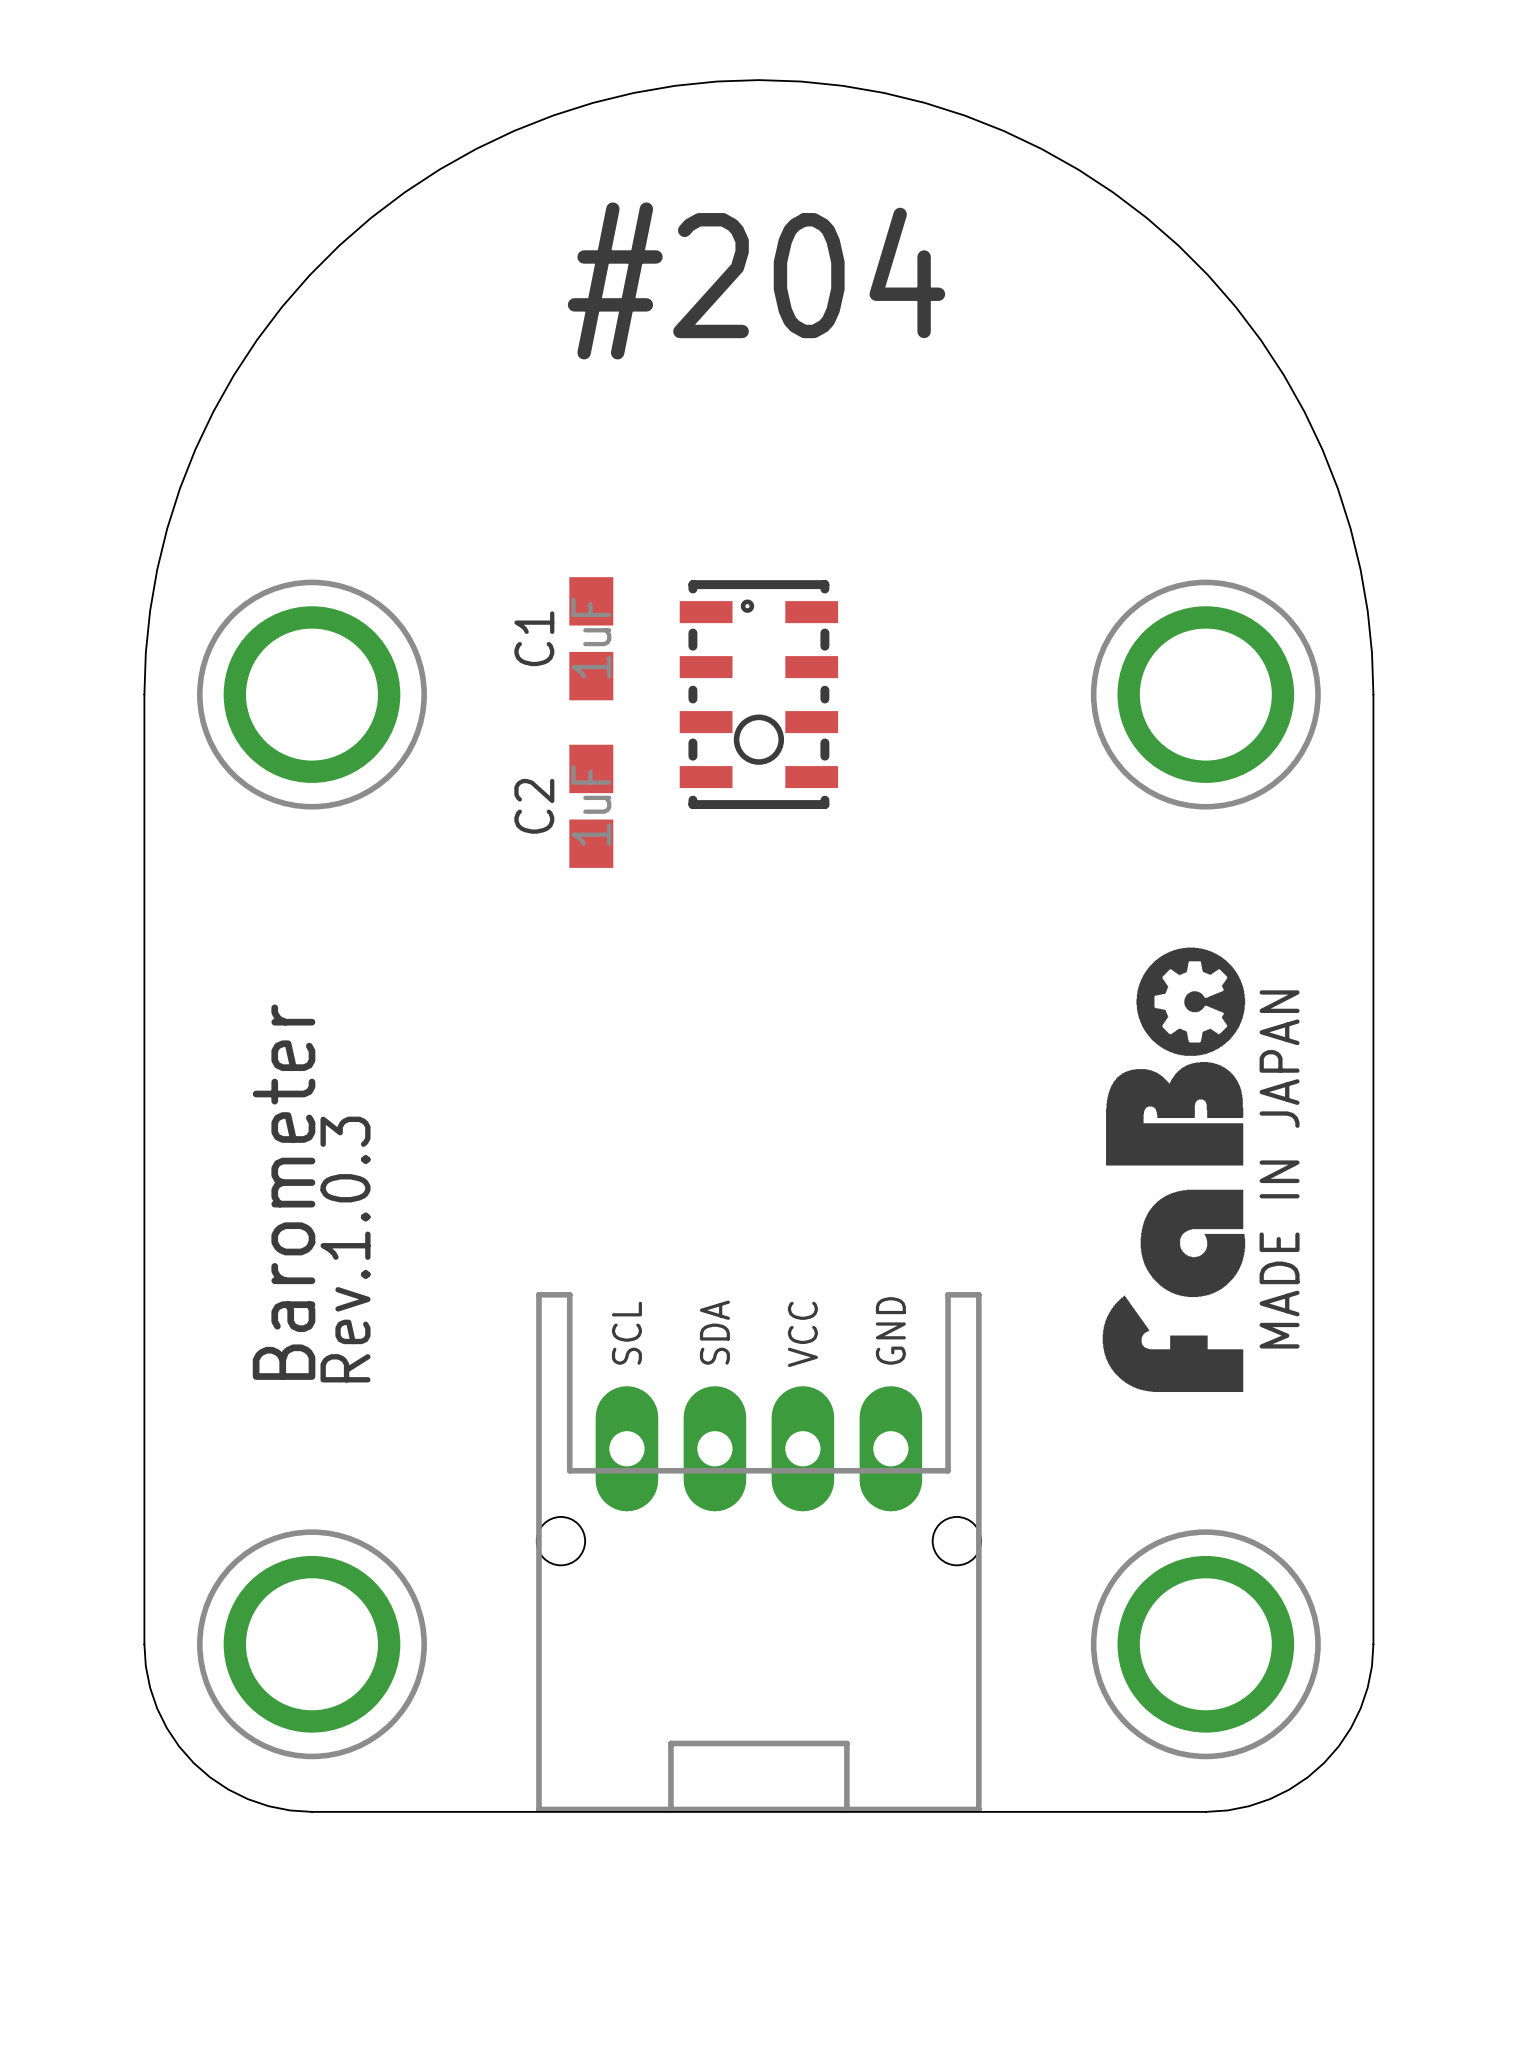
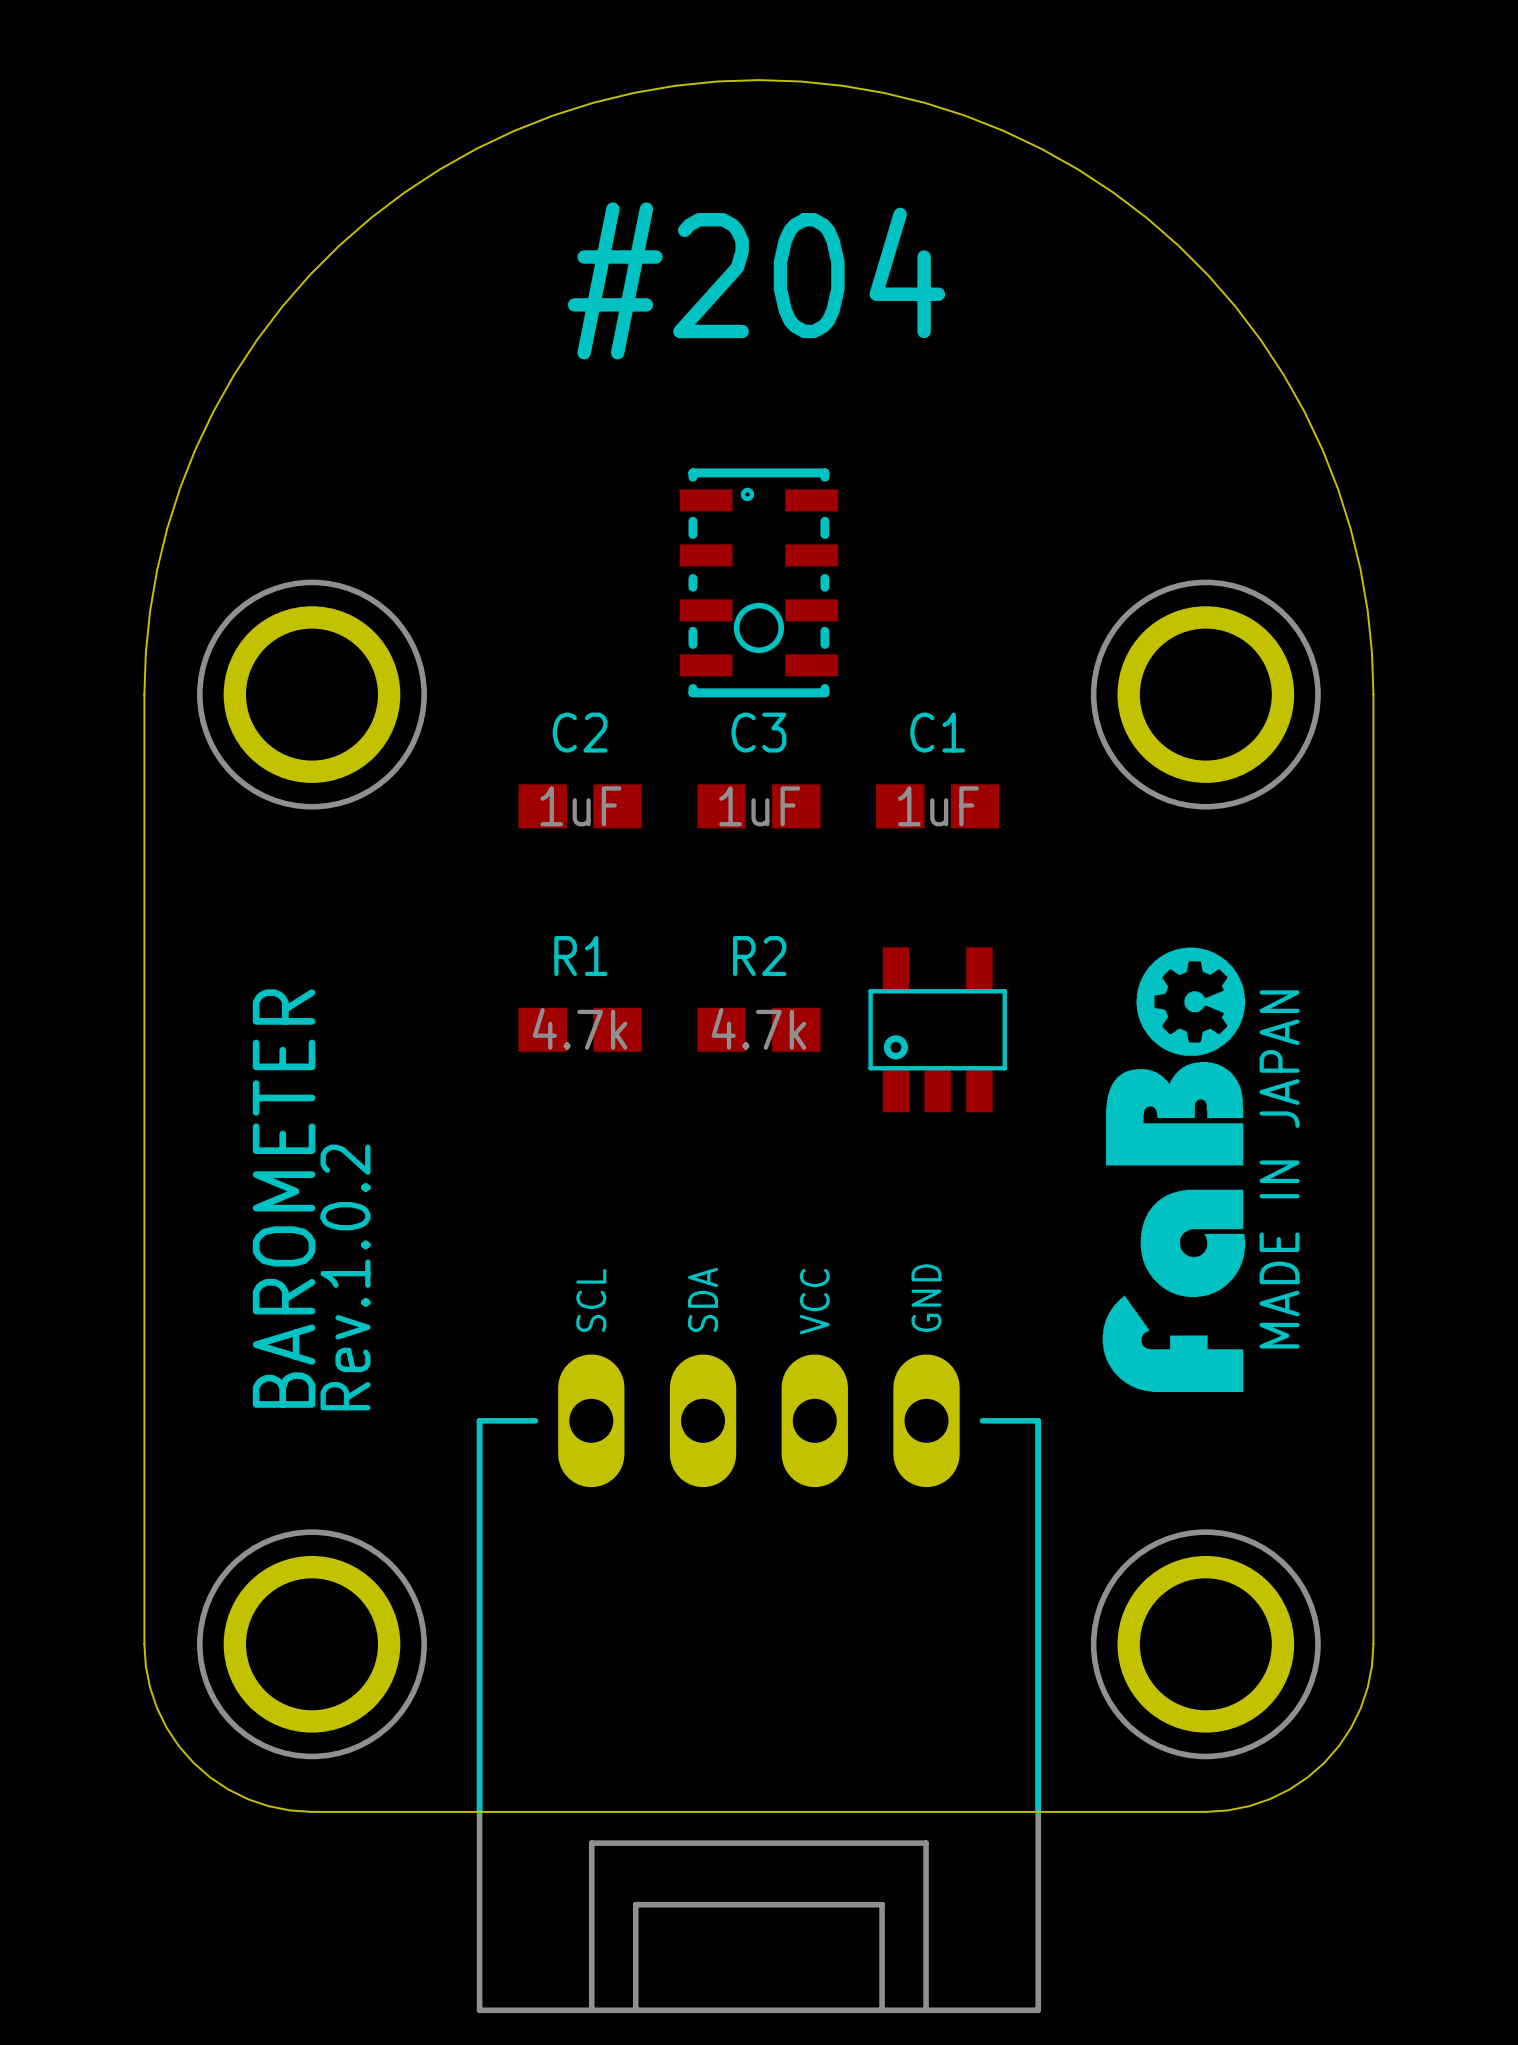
C1 rotation: 0° (591, 638) -> 90° clockwise (937, 806)
C1 position: (591, 638) -> (937, 806)
part position: (758, 694) -> (758, 582)
C2 rotation: 0° (591, 806) -> 90° clockwise (580, 806)
C3: none -> 1uF (758, 806)
part: (758, 946) -> none
R1: none -> 4.7k (580, 1029)
R2: none -> 4.7k (758, 1029)
part: none -> (937, 1029)
part: none -> (758, 1046)
text: Barometer (284, 1192) -> BAROMETER (284, 1198)
text: Rev.1.0.3 (345, 1249) -> Rev.1.0.2 (345, 1277)

